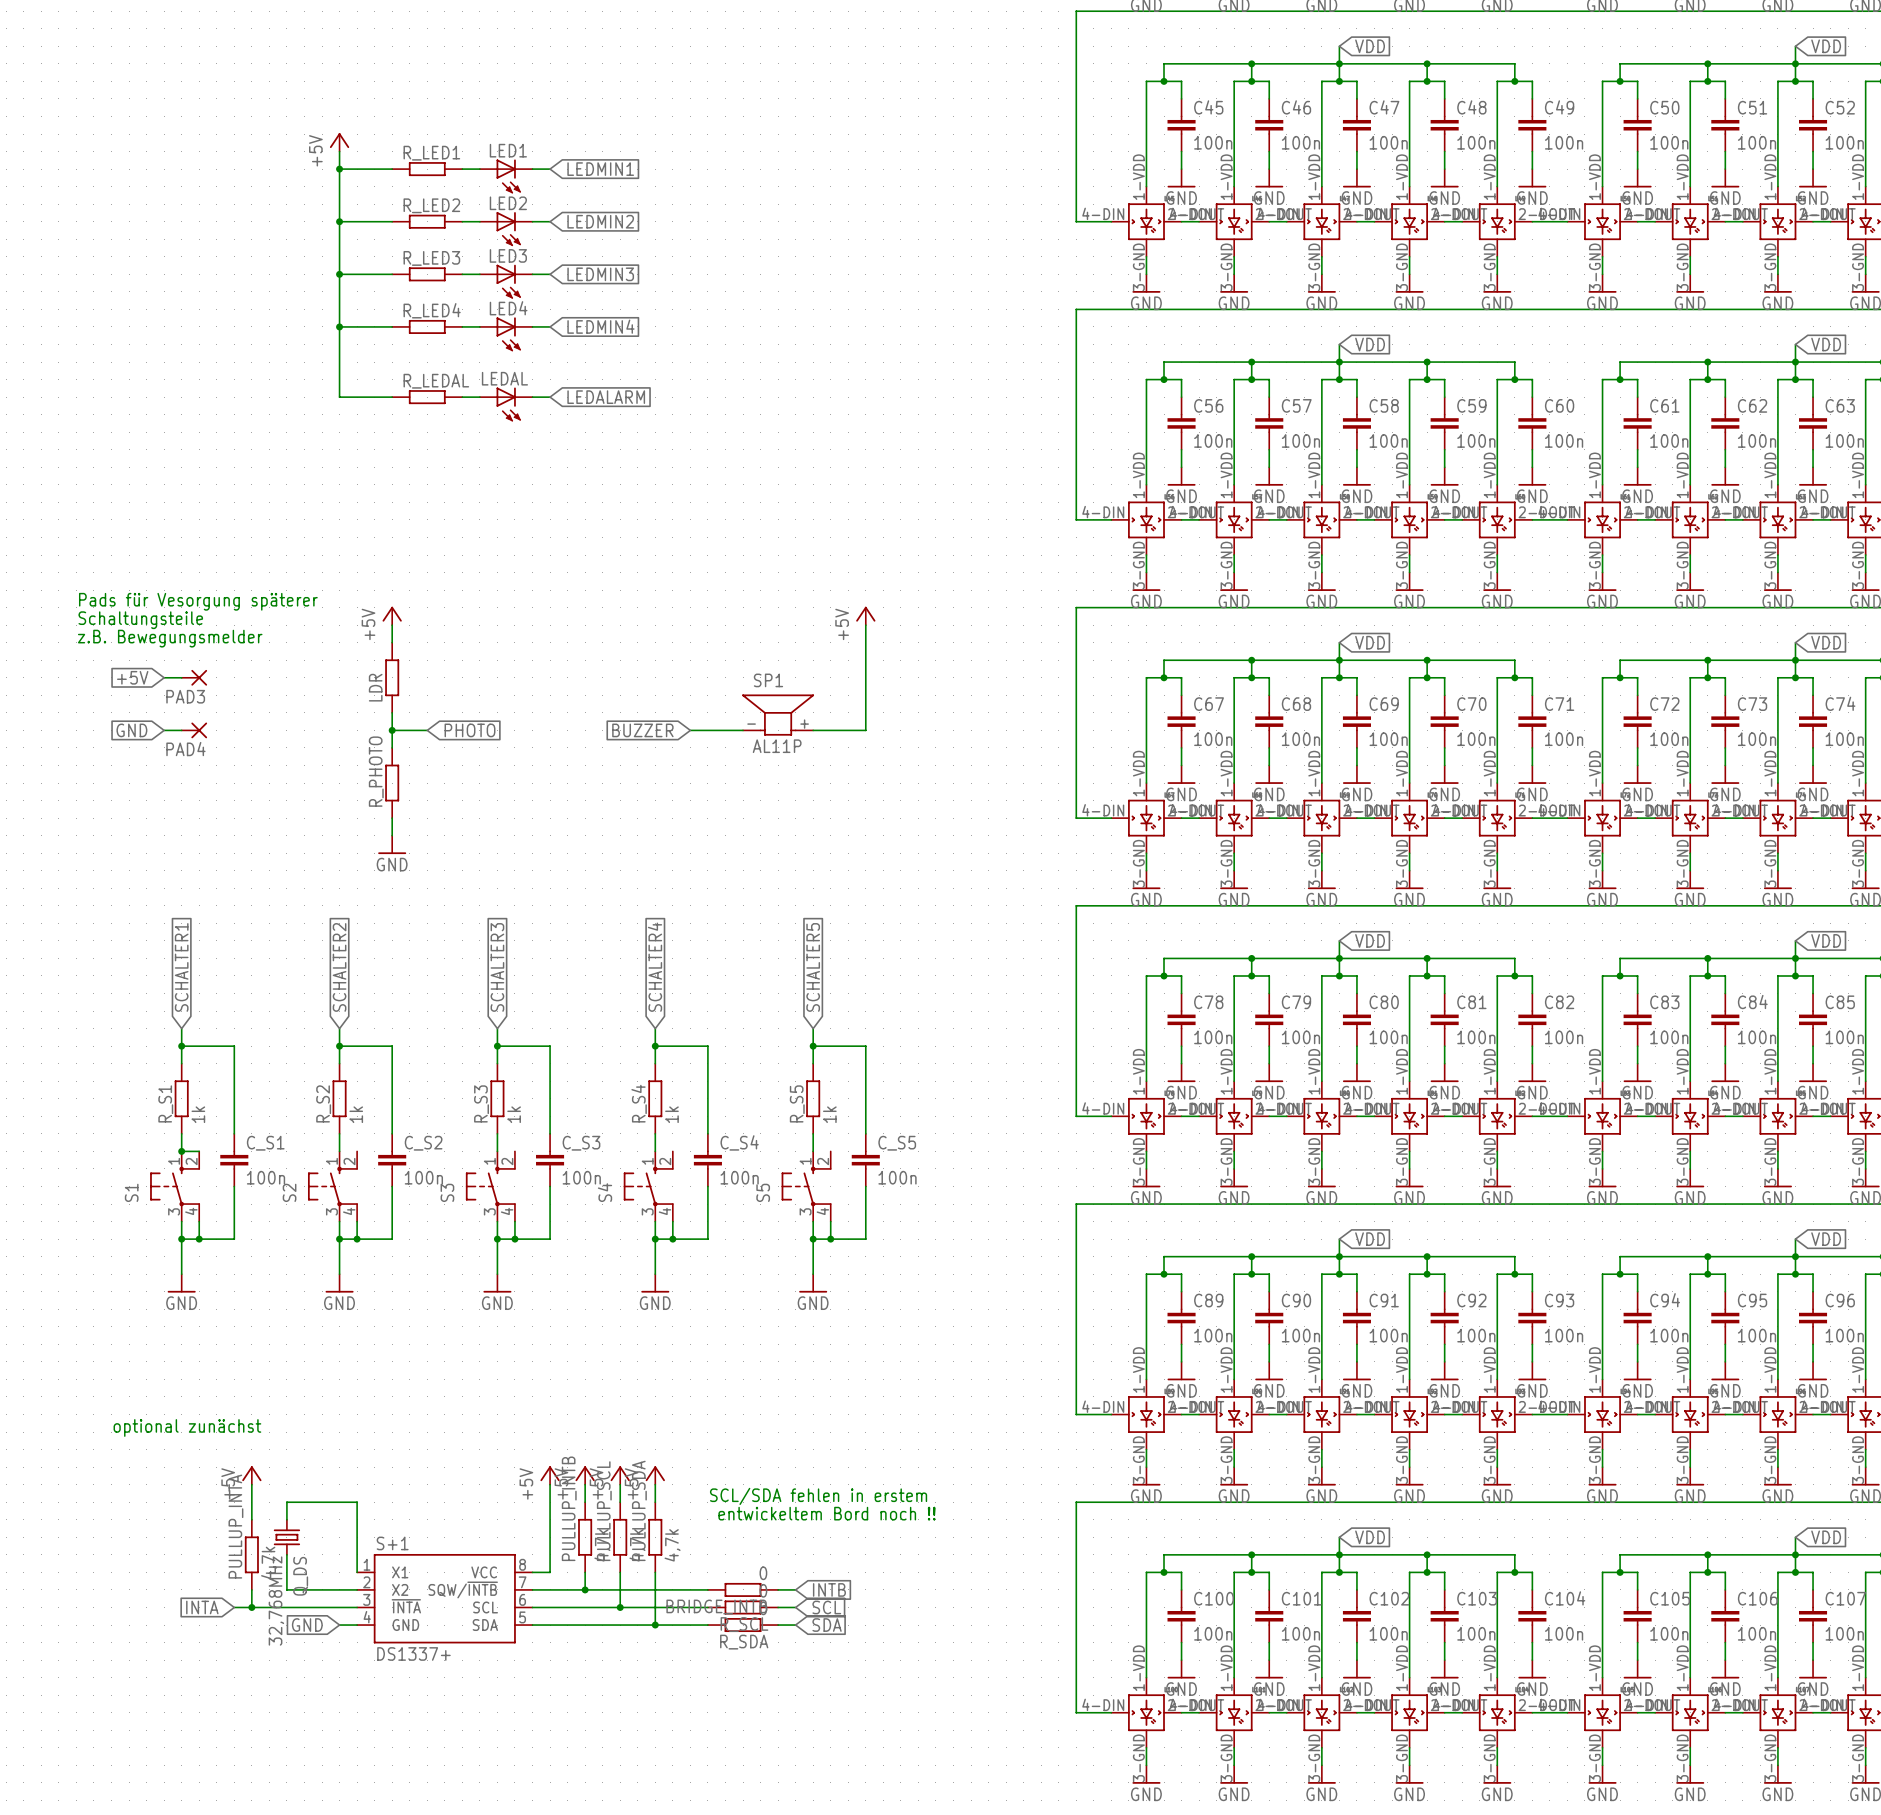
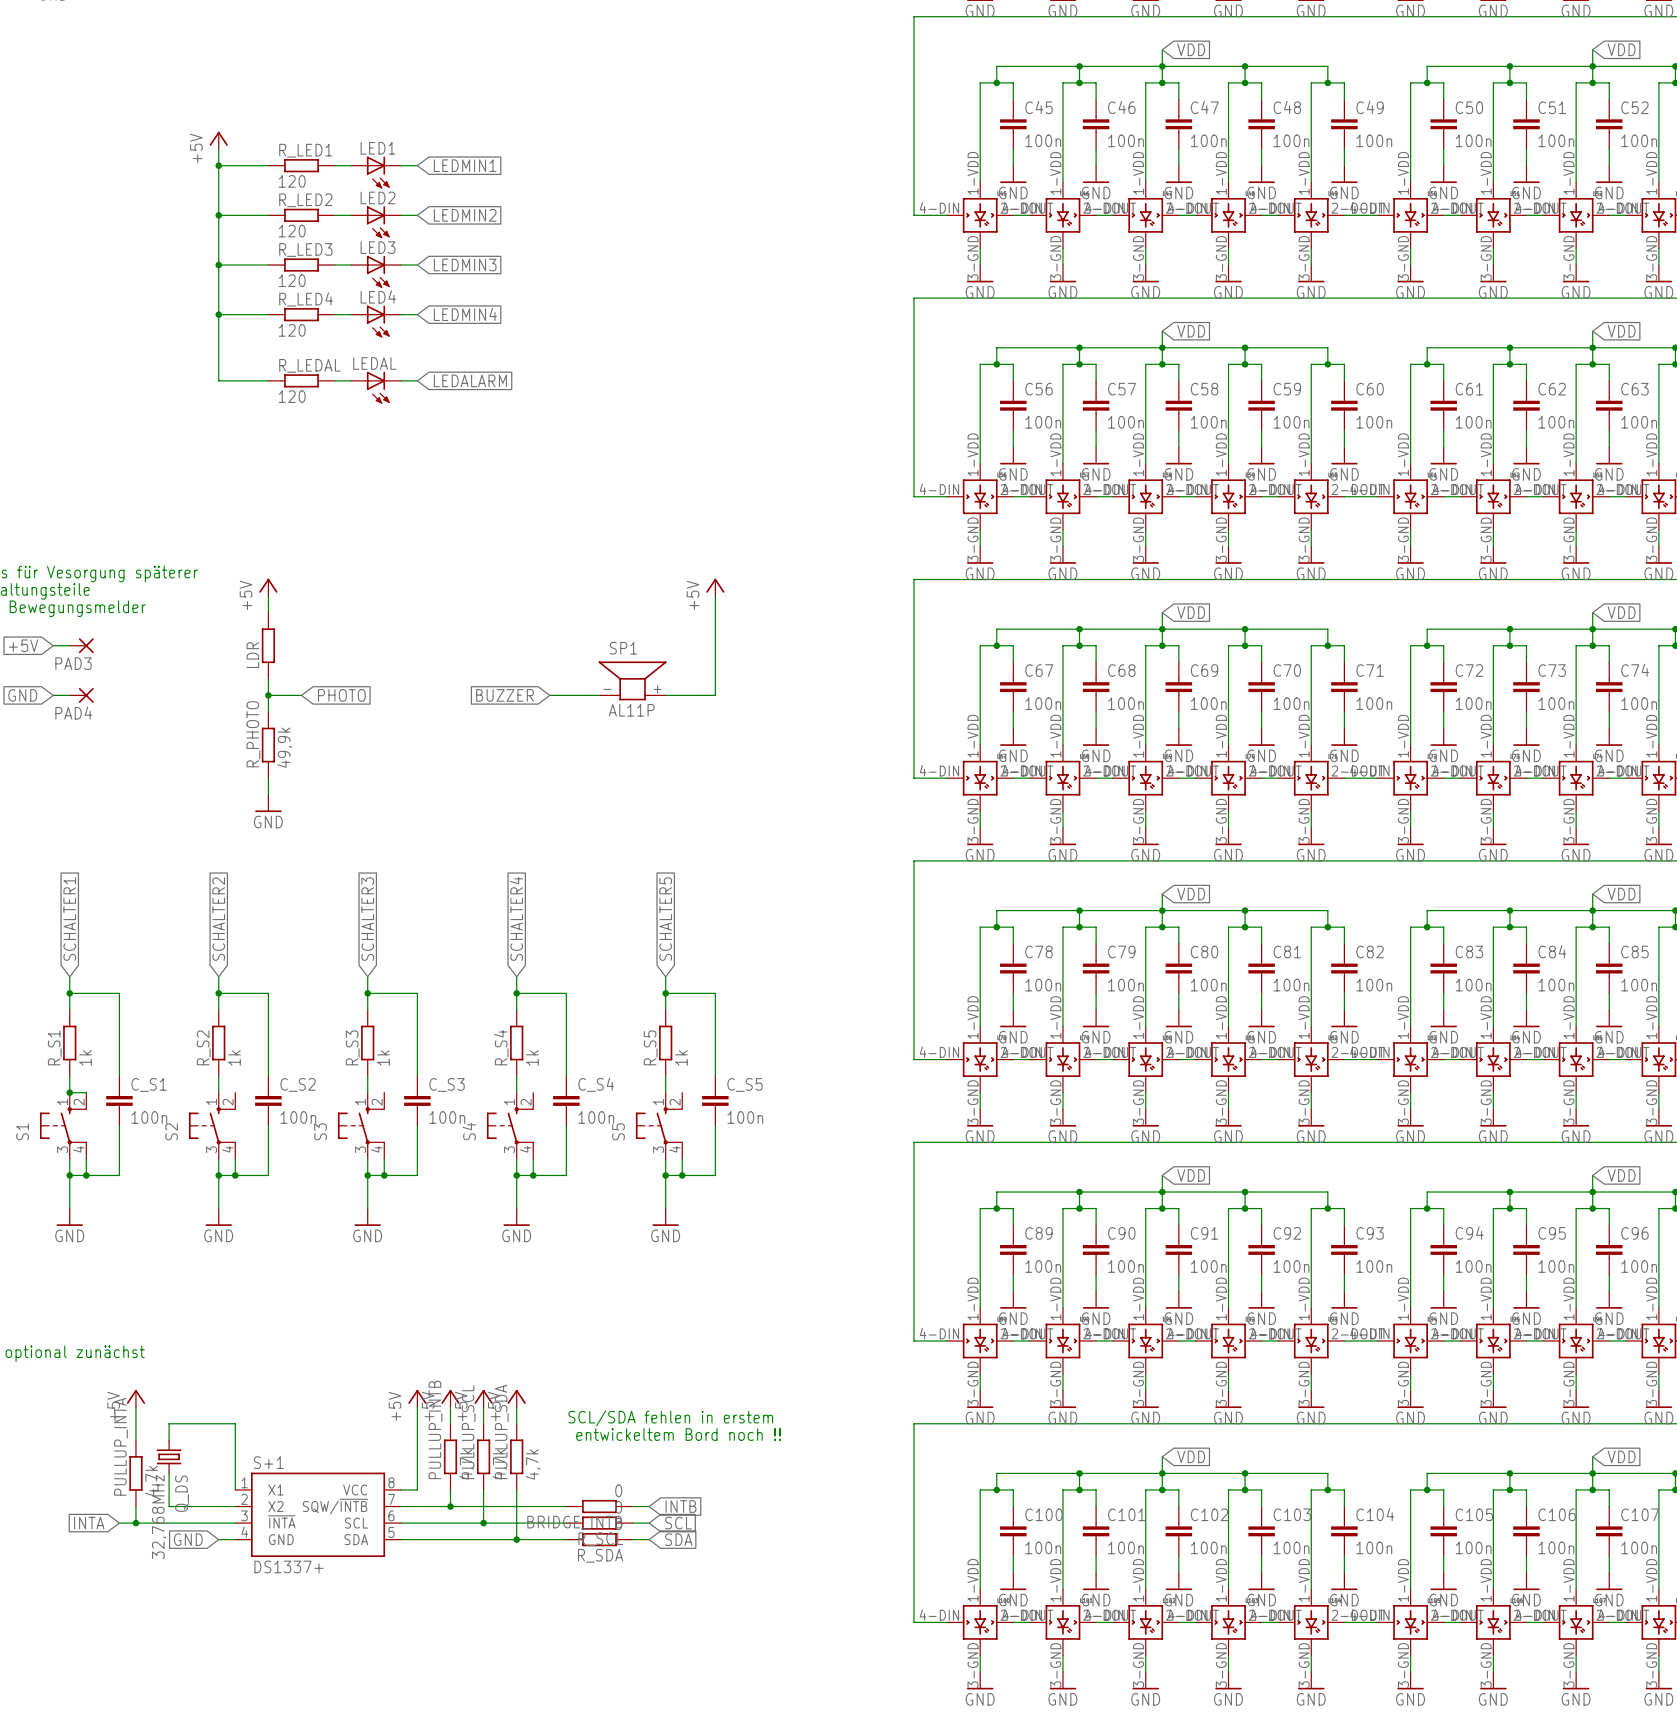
R_LED1 value: none -> 120 (292, 181)
R_LED2 value: none -> 120 (292, 231)
R_LED3 value: none -> 120 (292, 280)
R_LED4 value: none -> 120 (292, 330)
R_LEDAL value: none -> 120 (292, 396)
R_PHOTO value: none -> 49,9k (284, 747)

